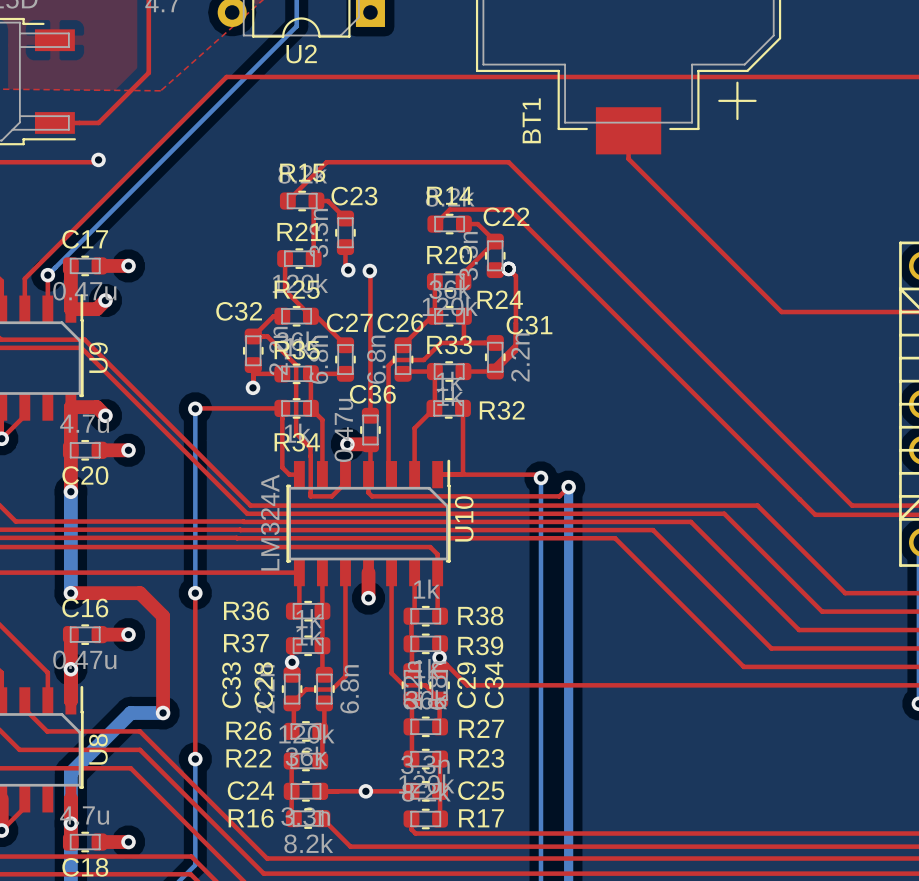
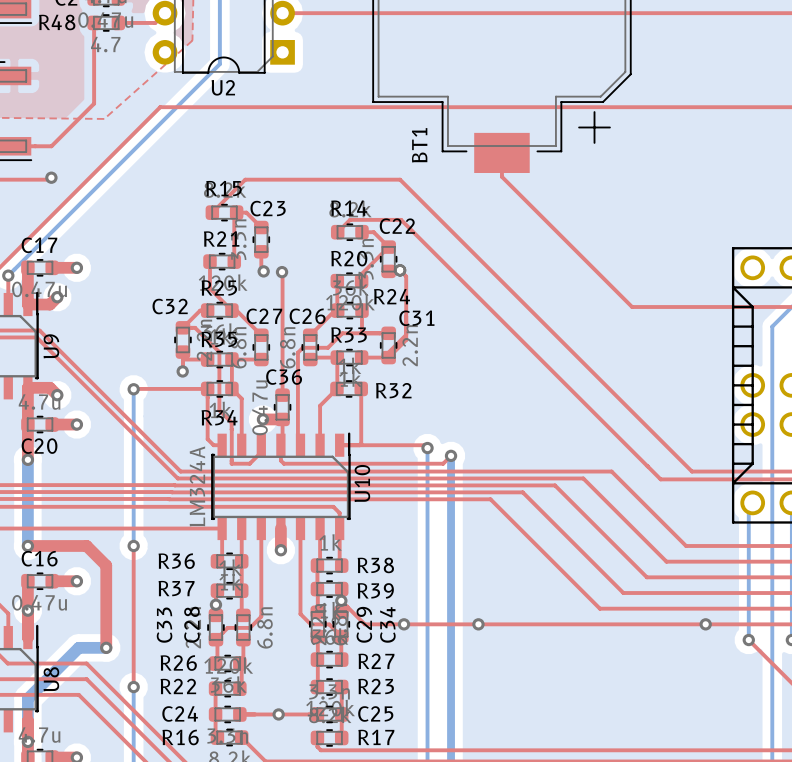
via: none -> (404, 624)
via: none -> (478, 624)
via: none -> (705, 624)

